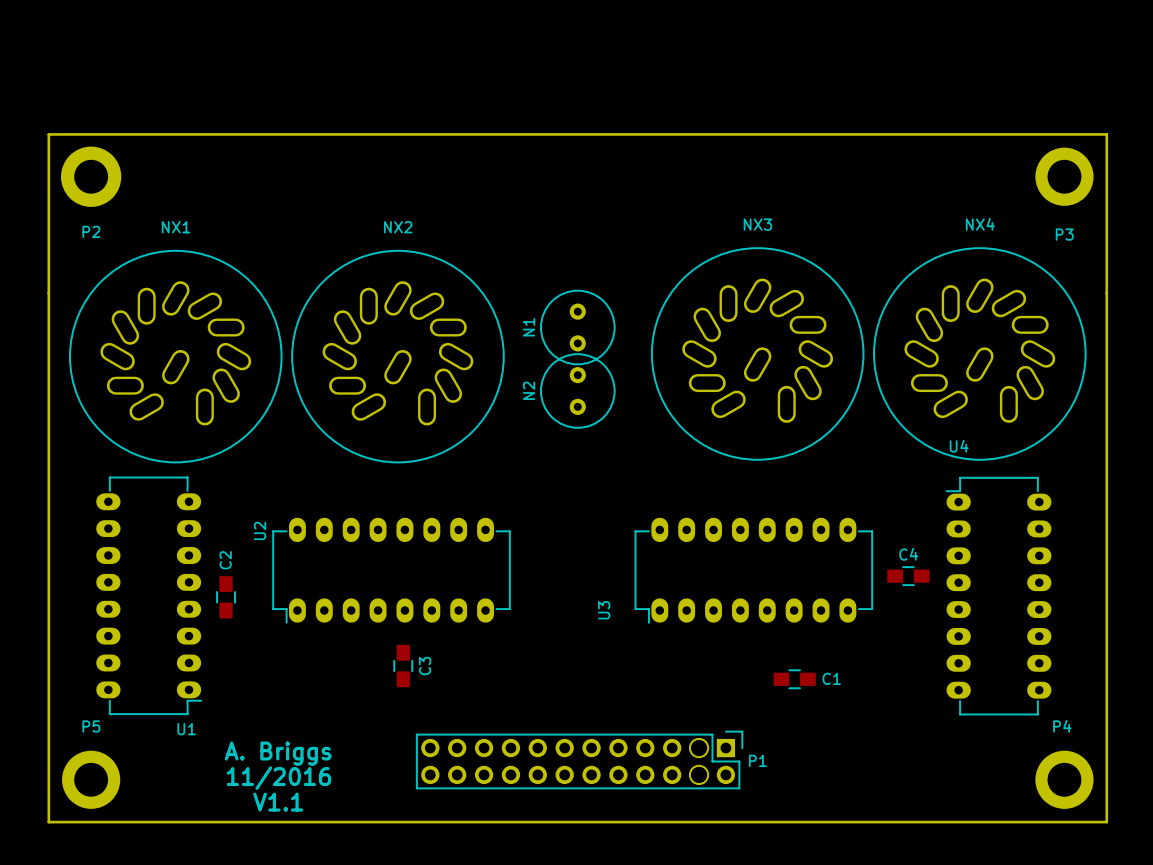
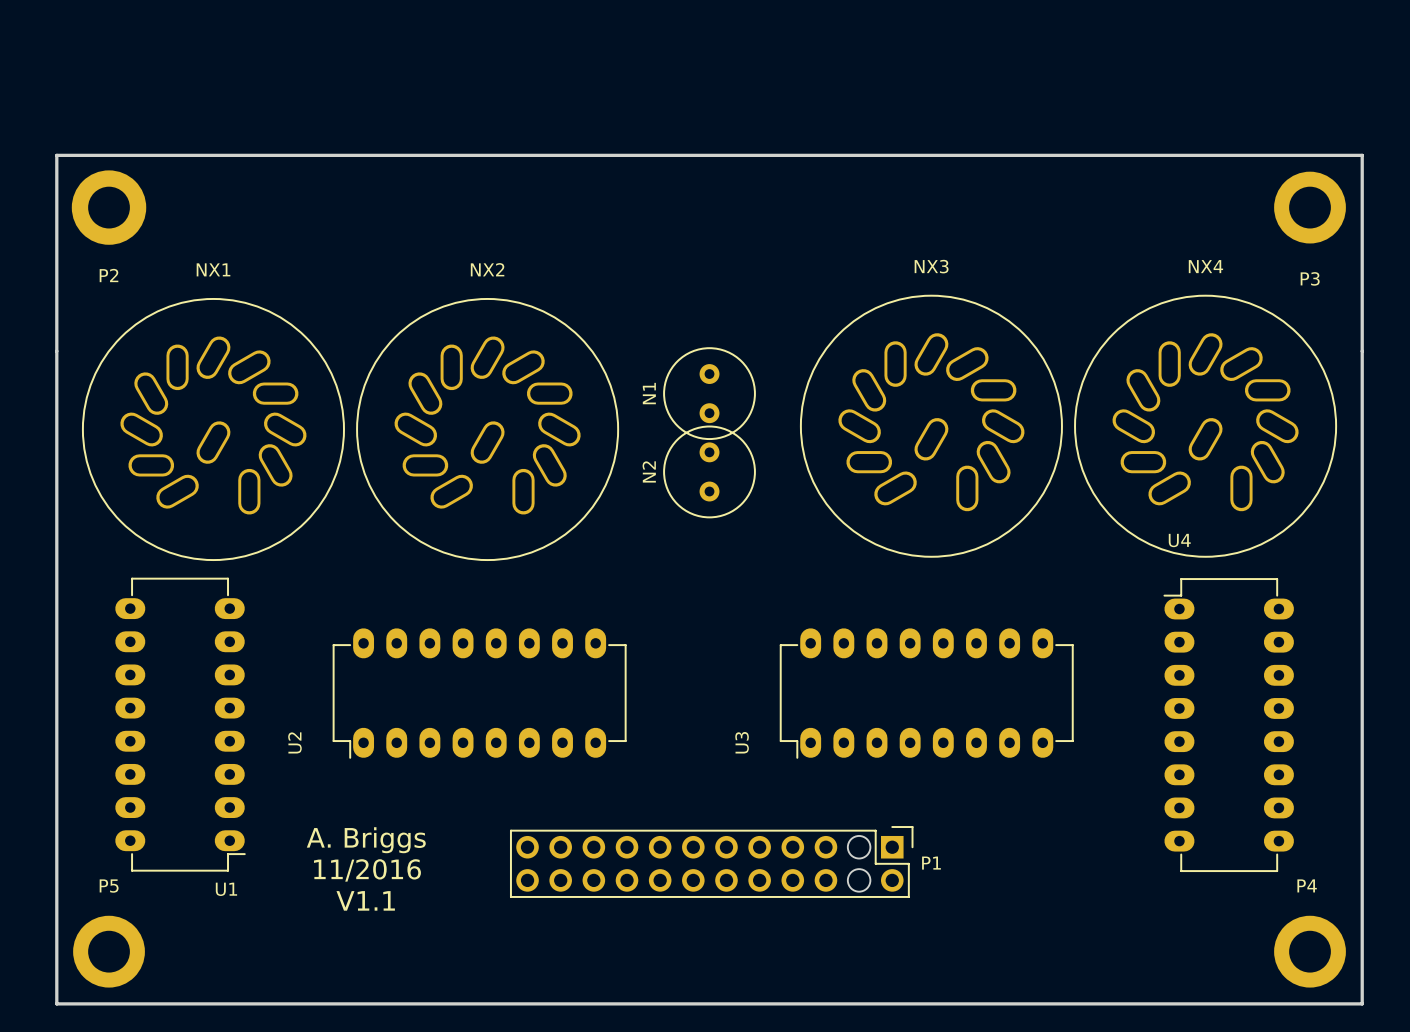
U2 name position: U2 (260, 530) -> U2 (294, 742)
C4: (908, 576) -> none
C2: (226, 597) -> none
C3: (403, 666) -> none
C1: (794, 679) -> none
text position: A. Briggs (278, 753) -> A. Briggs (366, 840)
P1 position: (579, 760) -> (711, 861)
text position: 11/2016 (278, 778) -> 11/2016 (367, 870)
text position: V1.1 (278, 802) -> V1.1 (365, 900)

